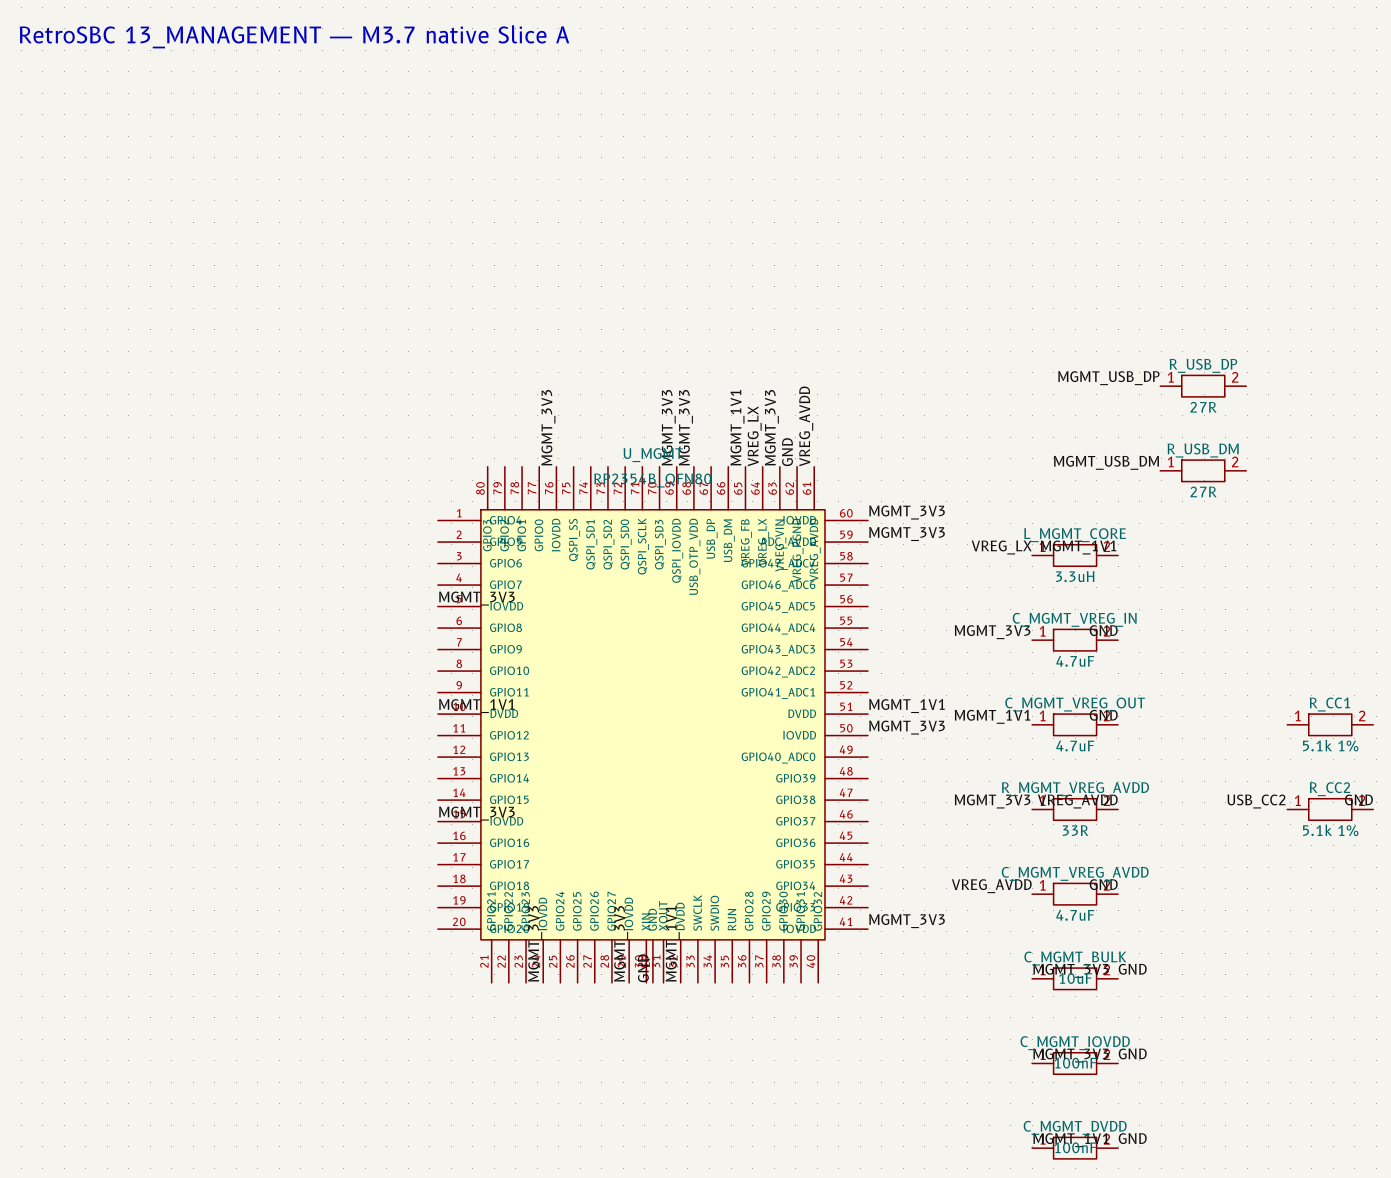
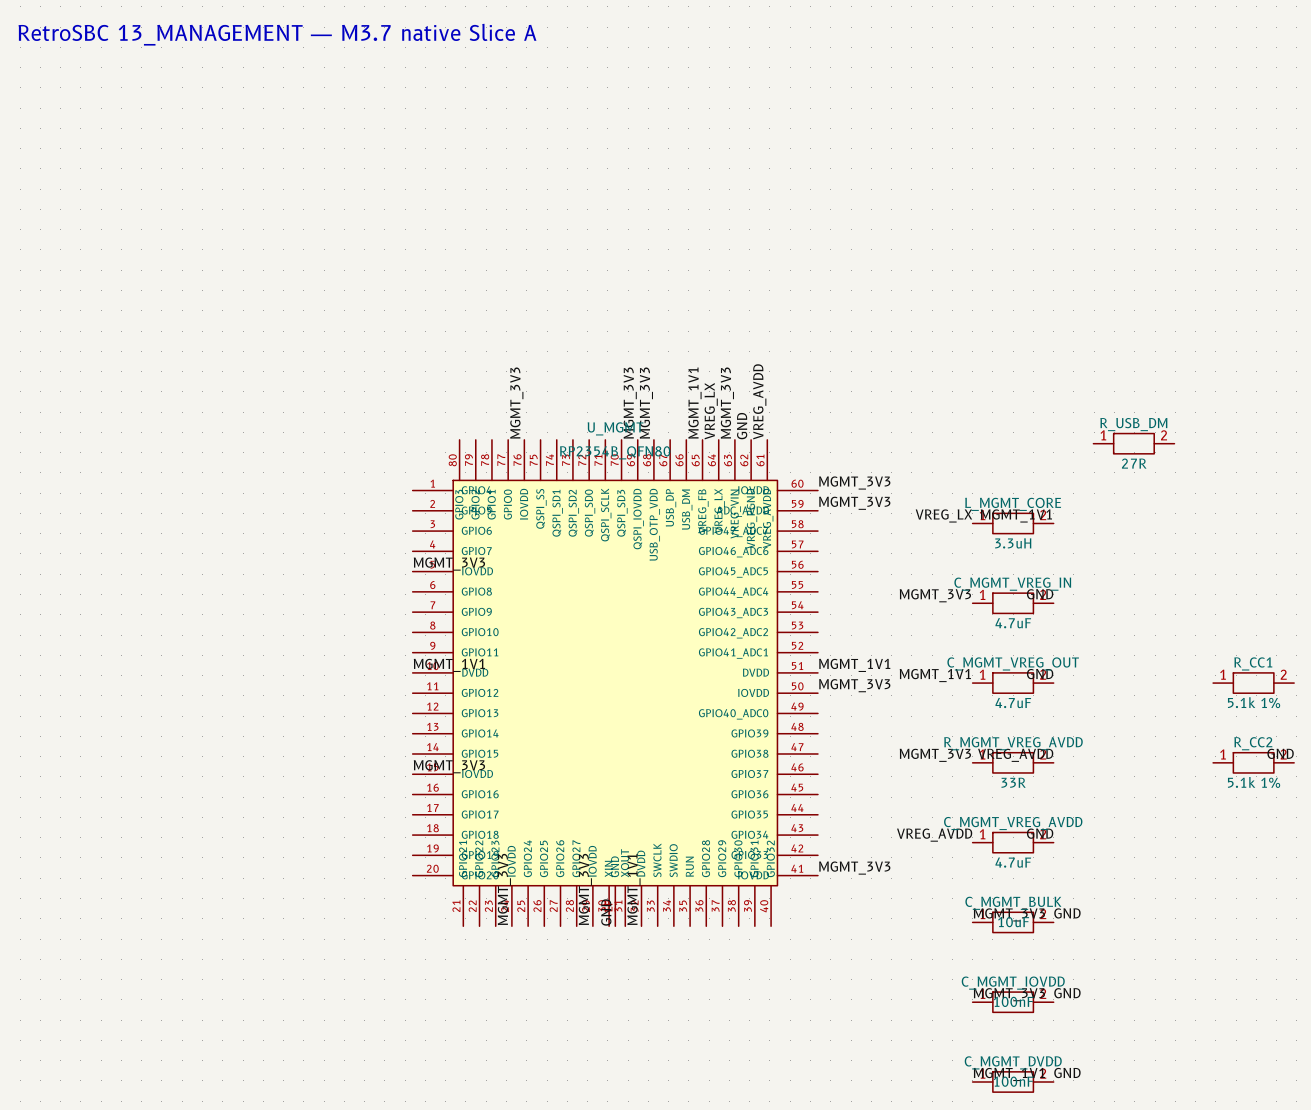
label: MGMT_USB_DP (1108, 378) -> none
R_USB_DP: 27R (1203, 386) -> none
label: MGMT_USB_DM (1106, 462) -> none
label: USB_CC2 (1256, 801) -> none

